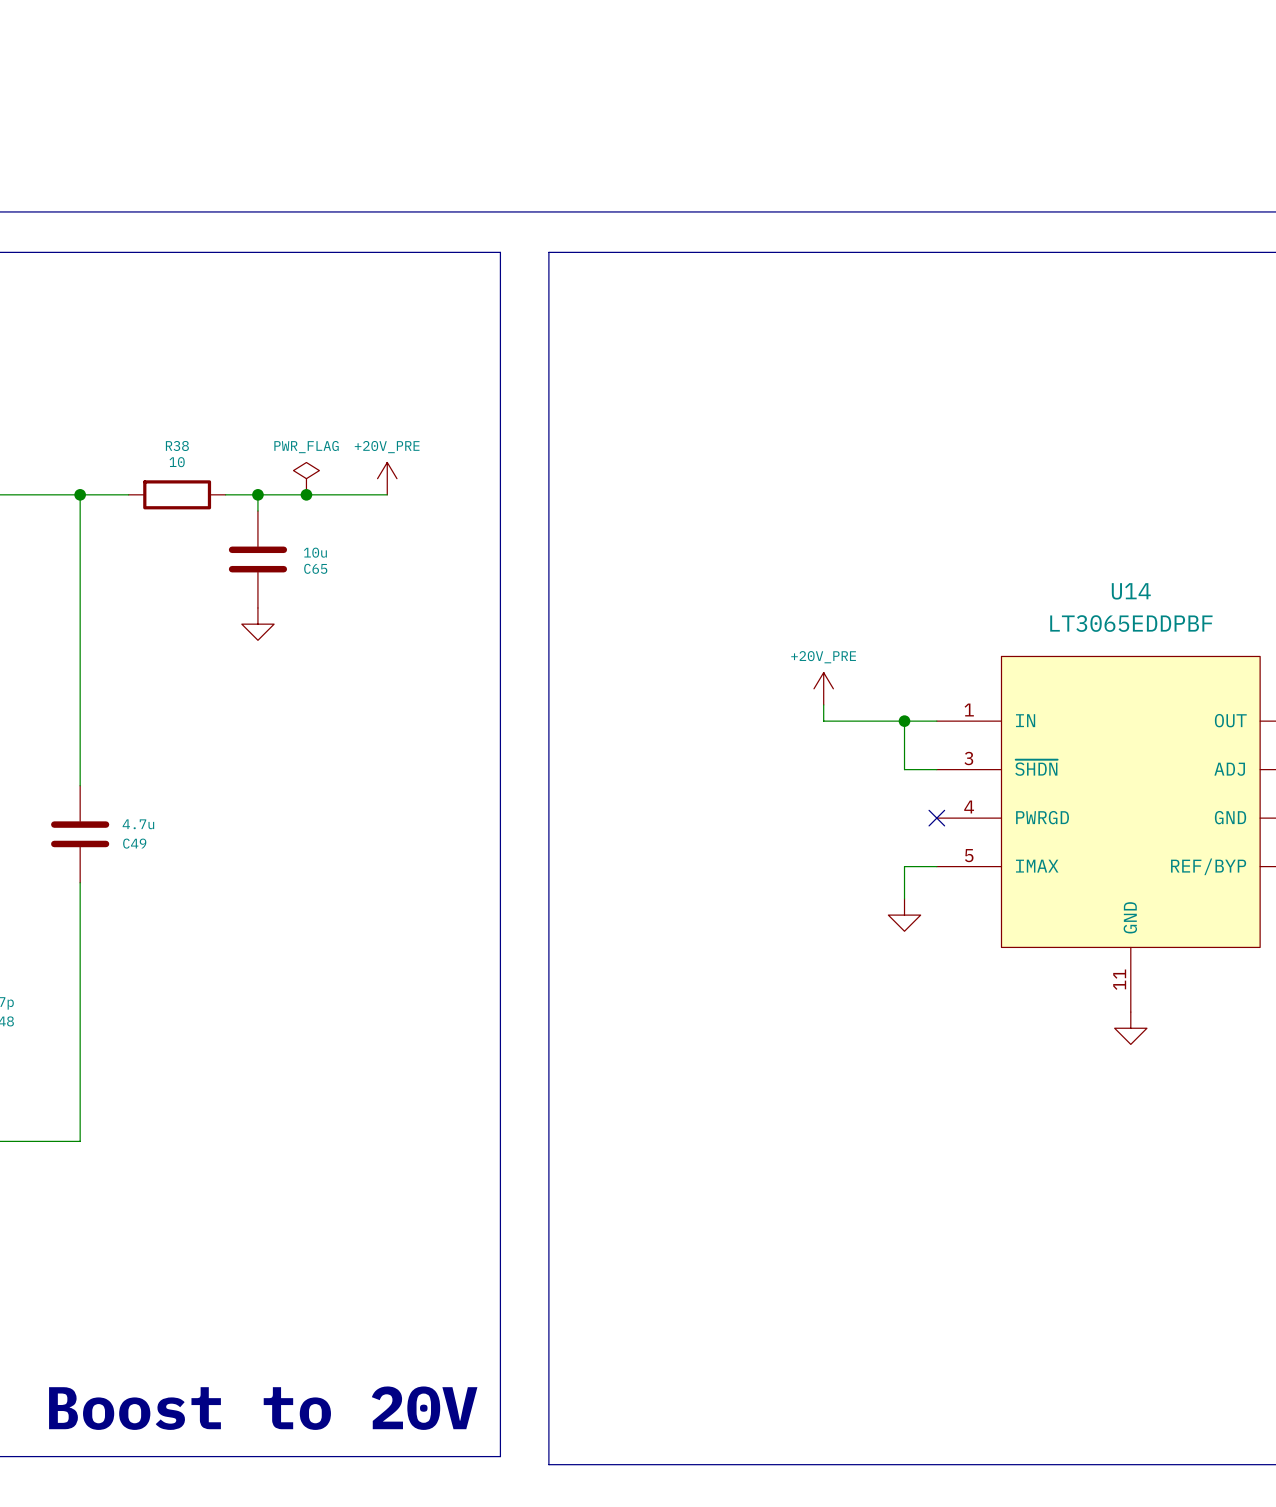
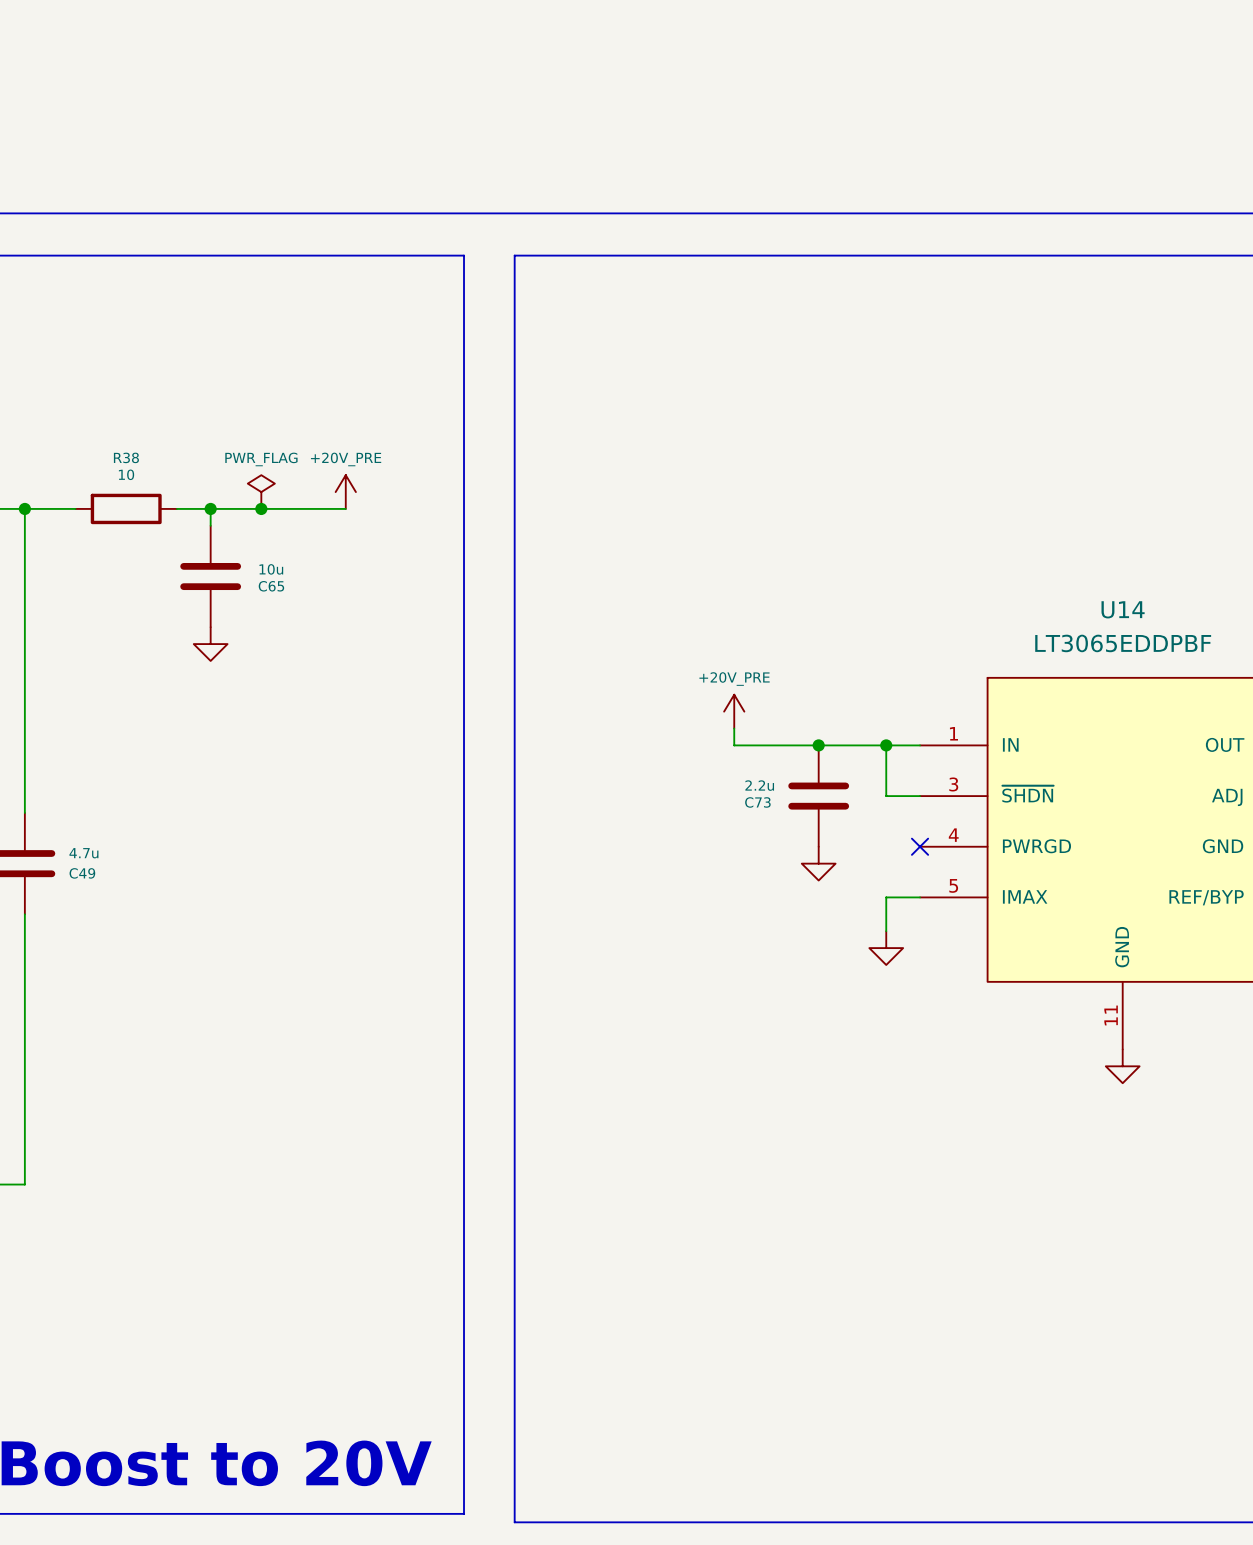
power symbol position: +20V_PRE (823, 688) -> +20V_PRE (734, 711)
wire: (823, 704) (823, 721) -> (734, 728) (734, 745) (801, 745)
junction: none -> (818, 745)
C73: none -> 2.2u (818, 796)
power symbol: none -> (818, 863)

